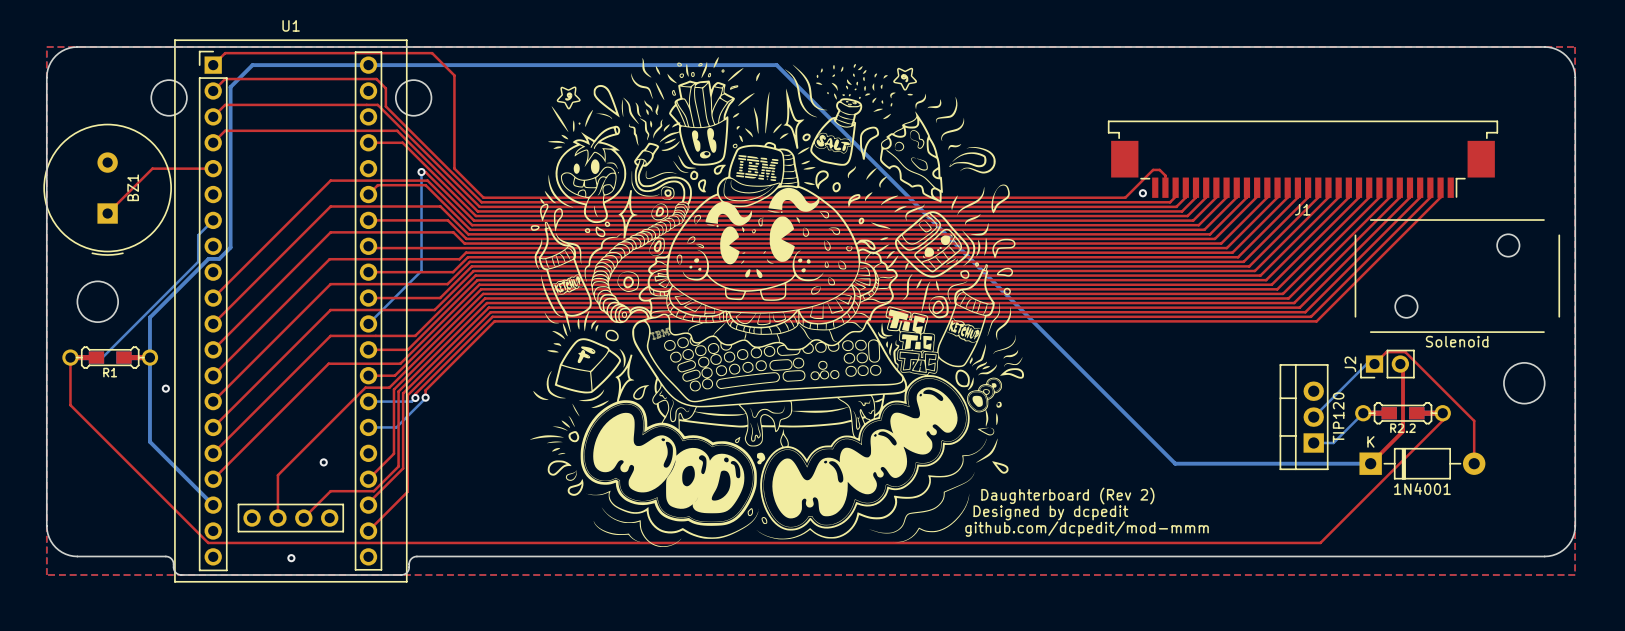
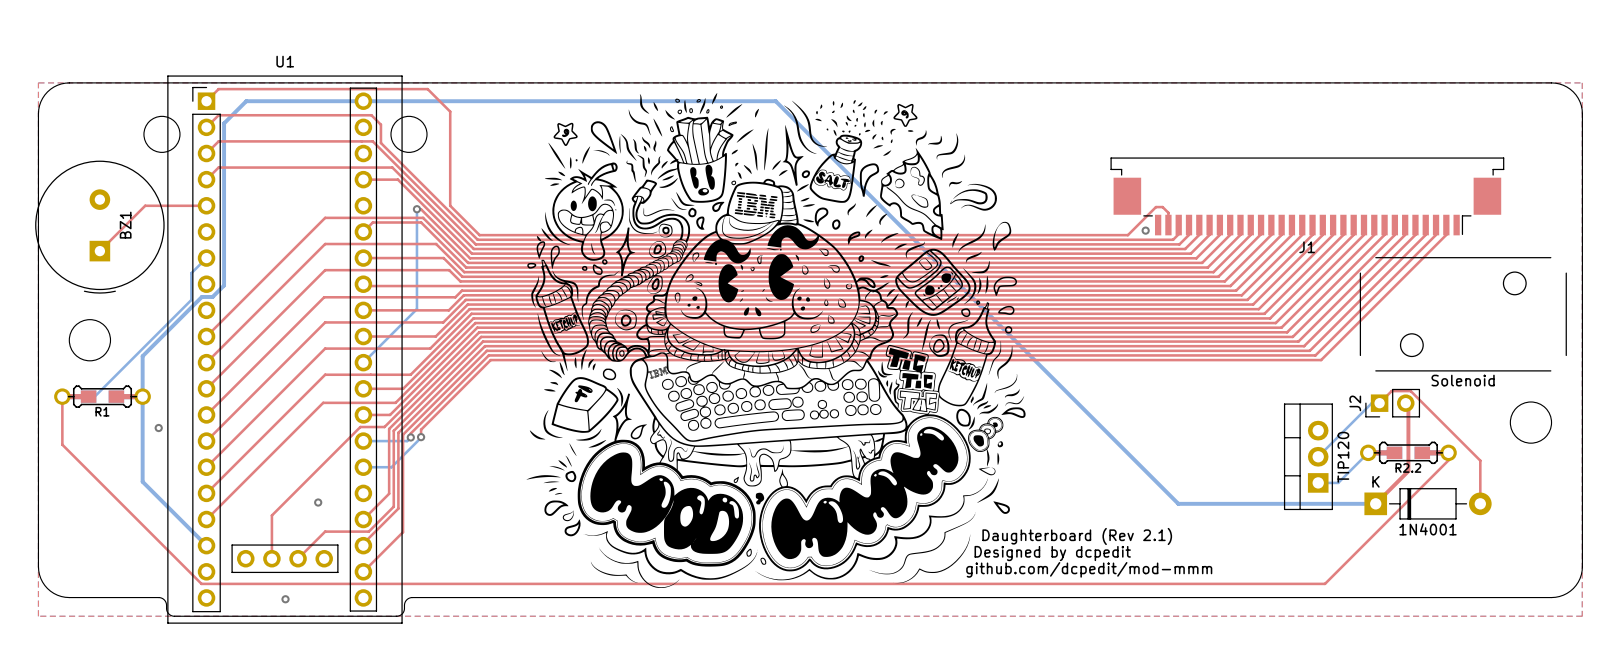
text: Daughterboard (Rev 2) (1067, 496) -> Daughterboard (Rev 2.1) (1077, 536)

